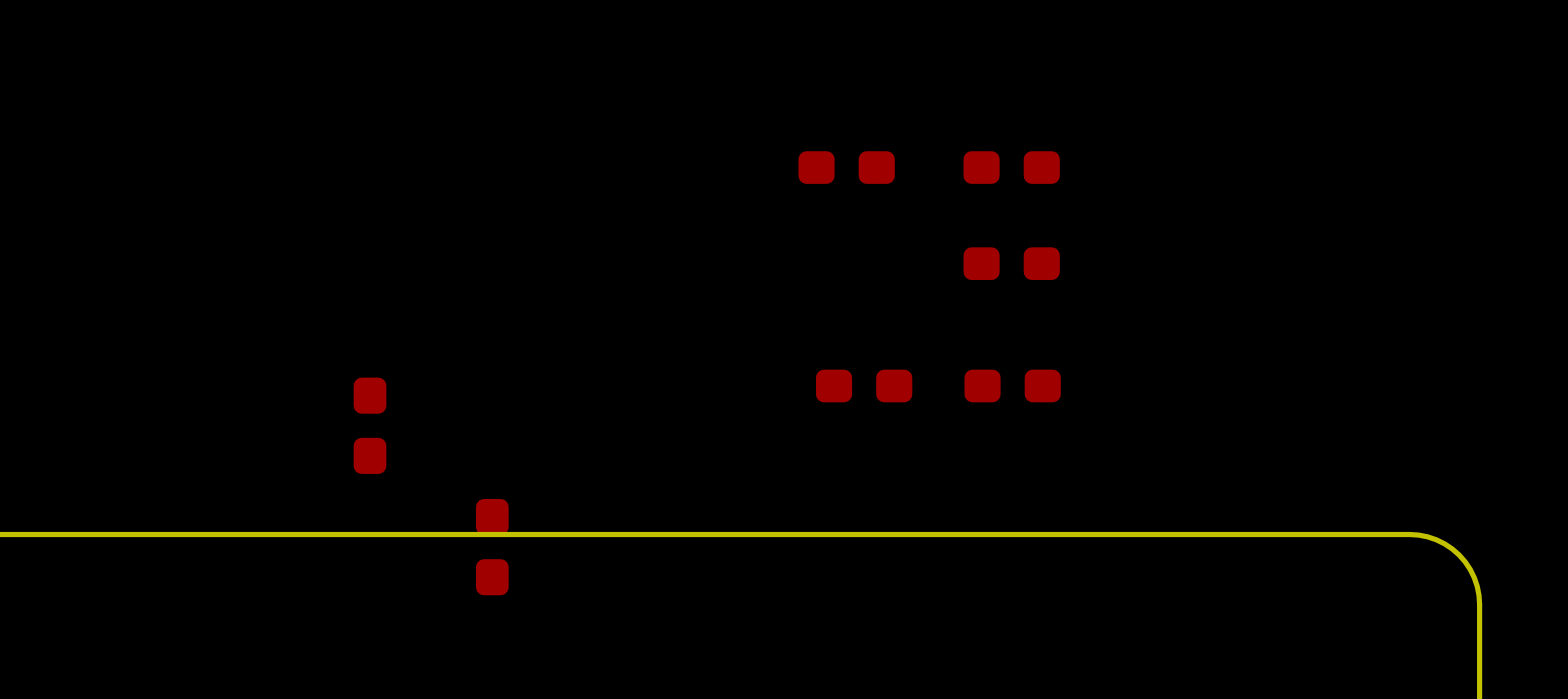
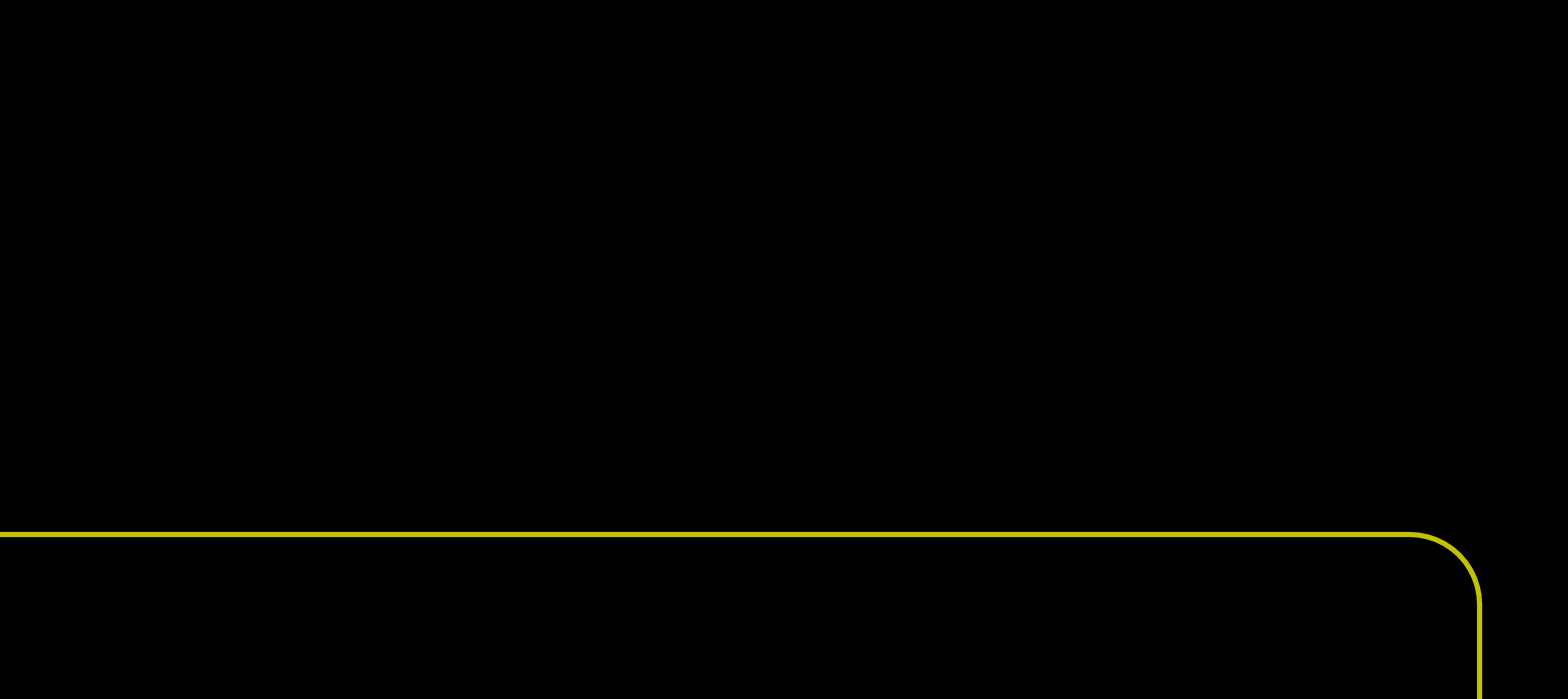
part: (846, 167) -> none
part: (1011, 167) -> none
part: (1011, 263) -> none
part: (864, 385) -> none
part: (1012, 385) -> none
part: (370, 425) -> none
part: (492, 547) -> none

